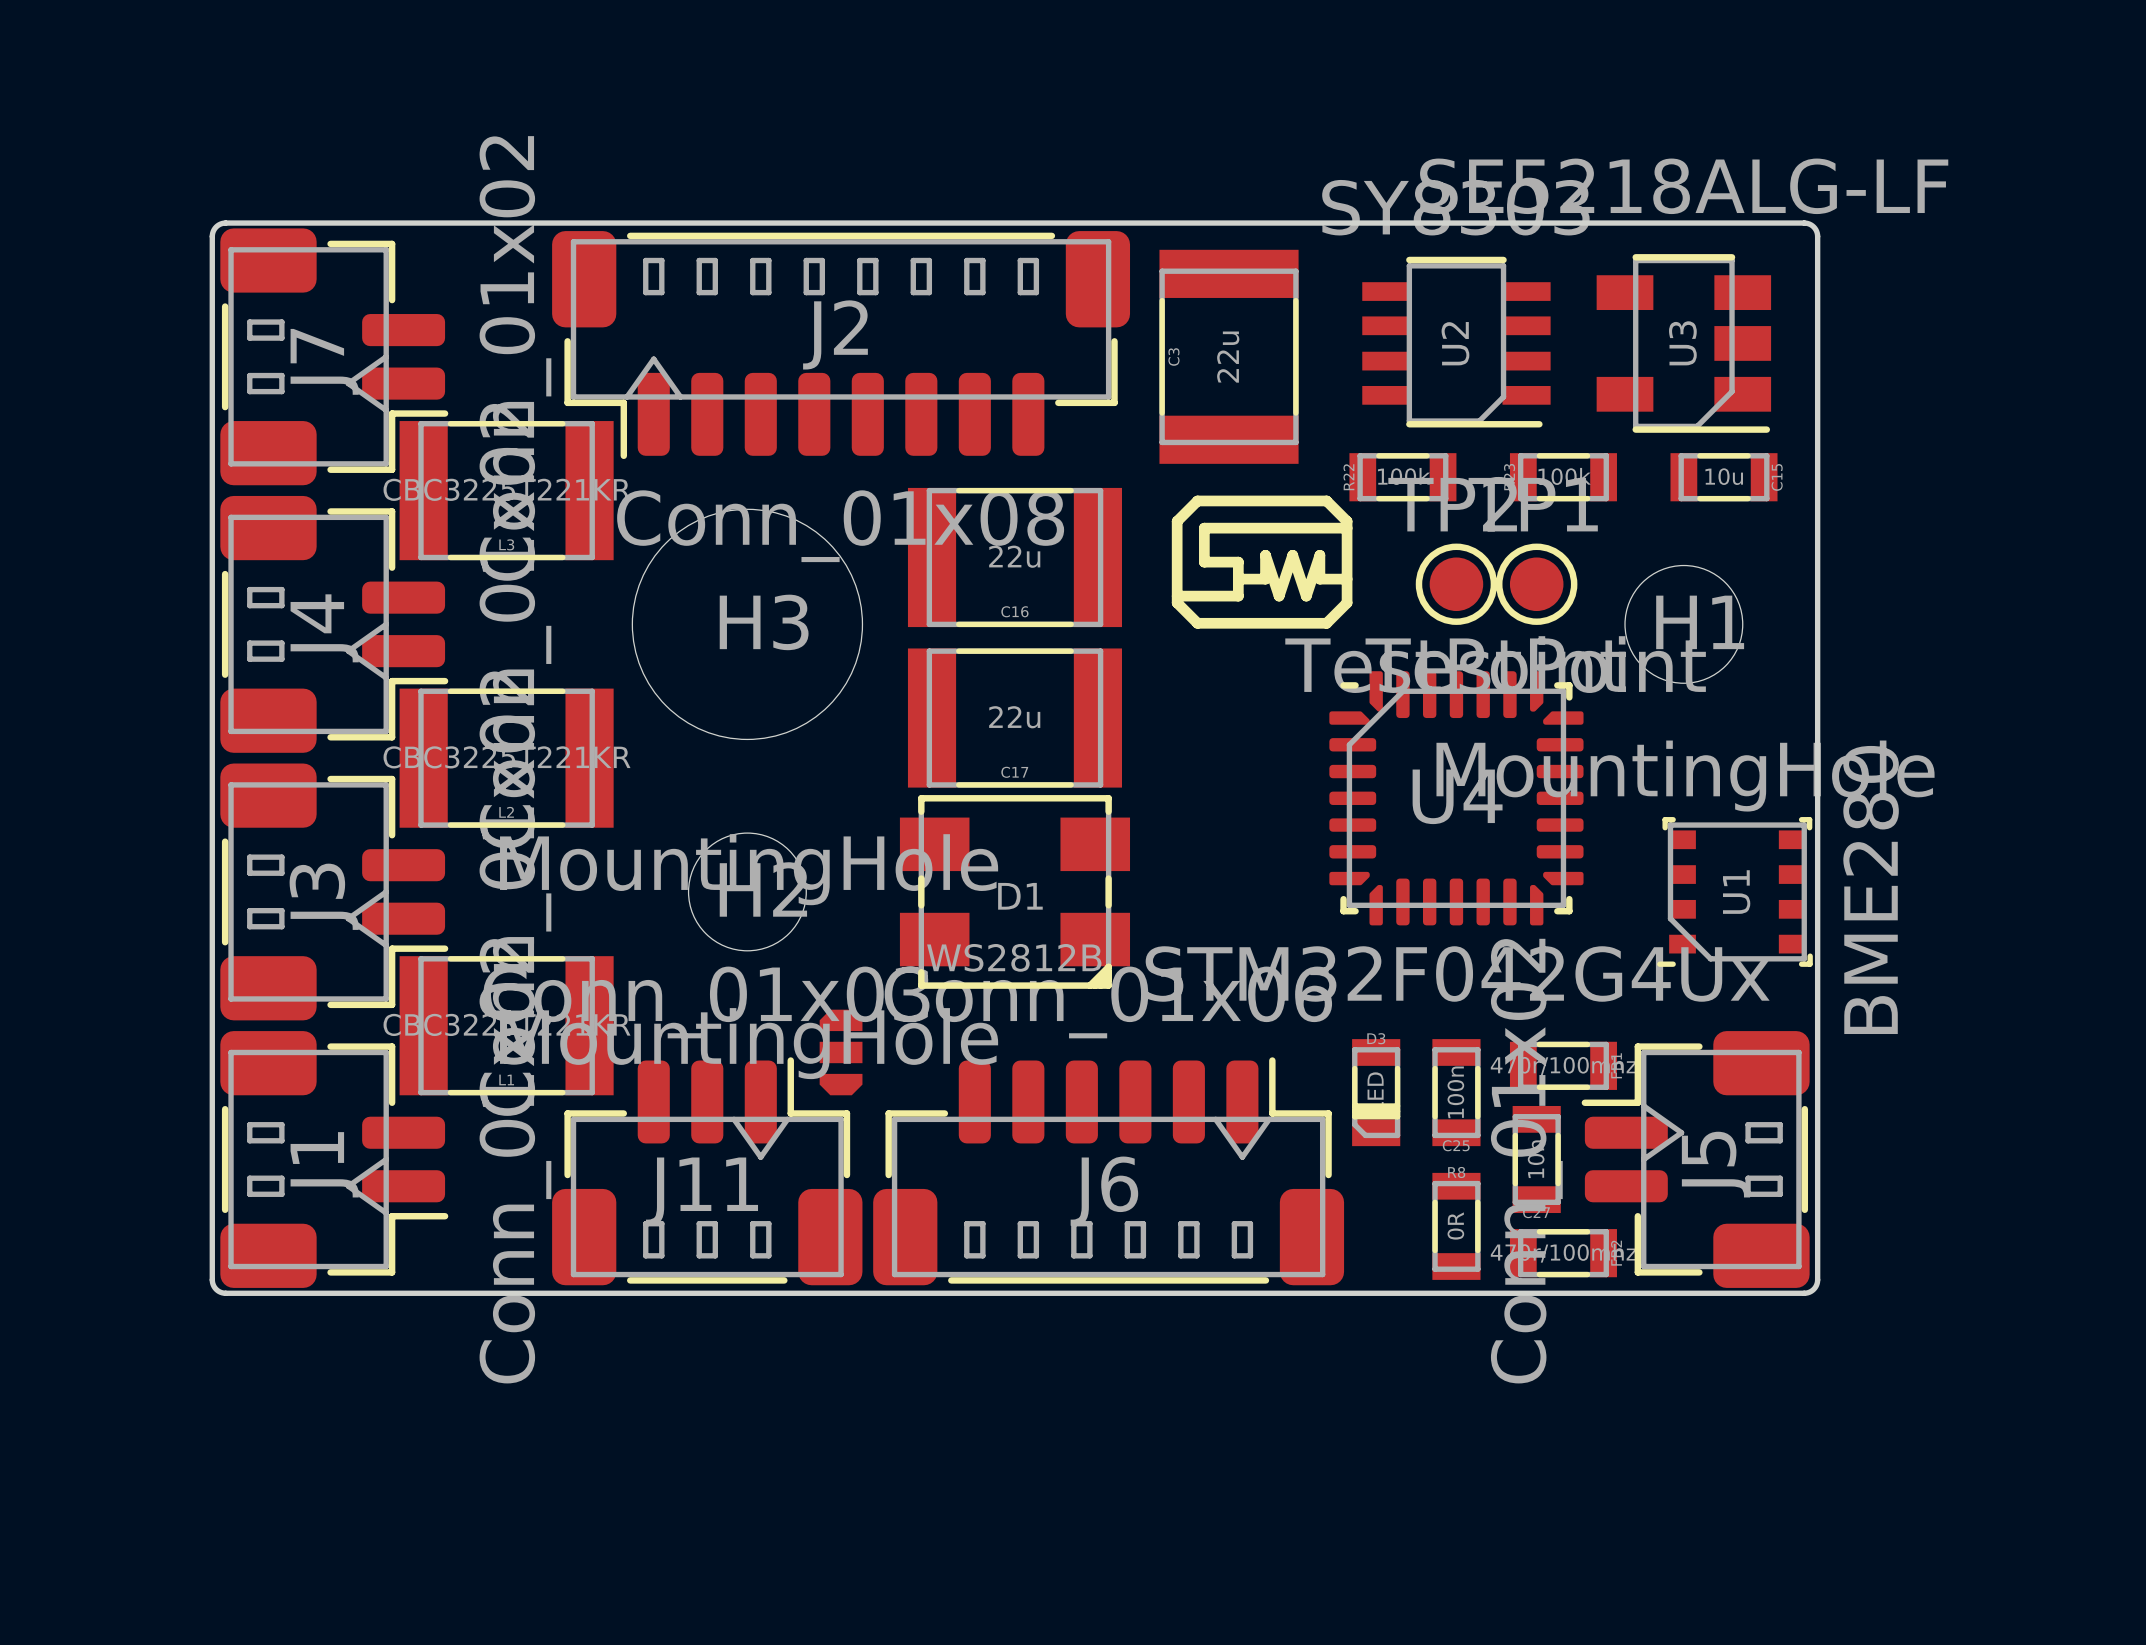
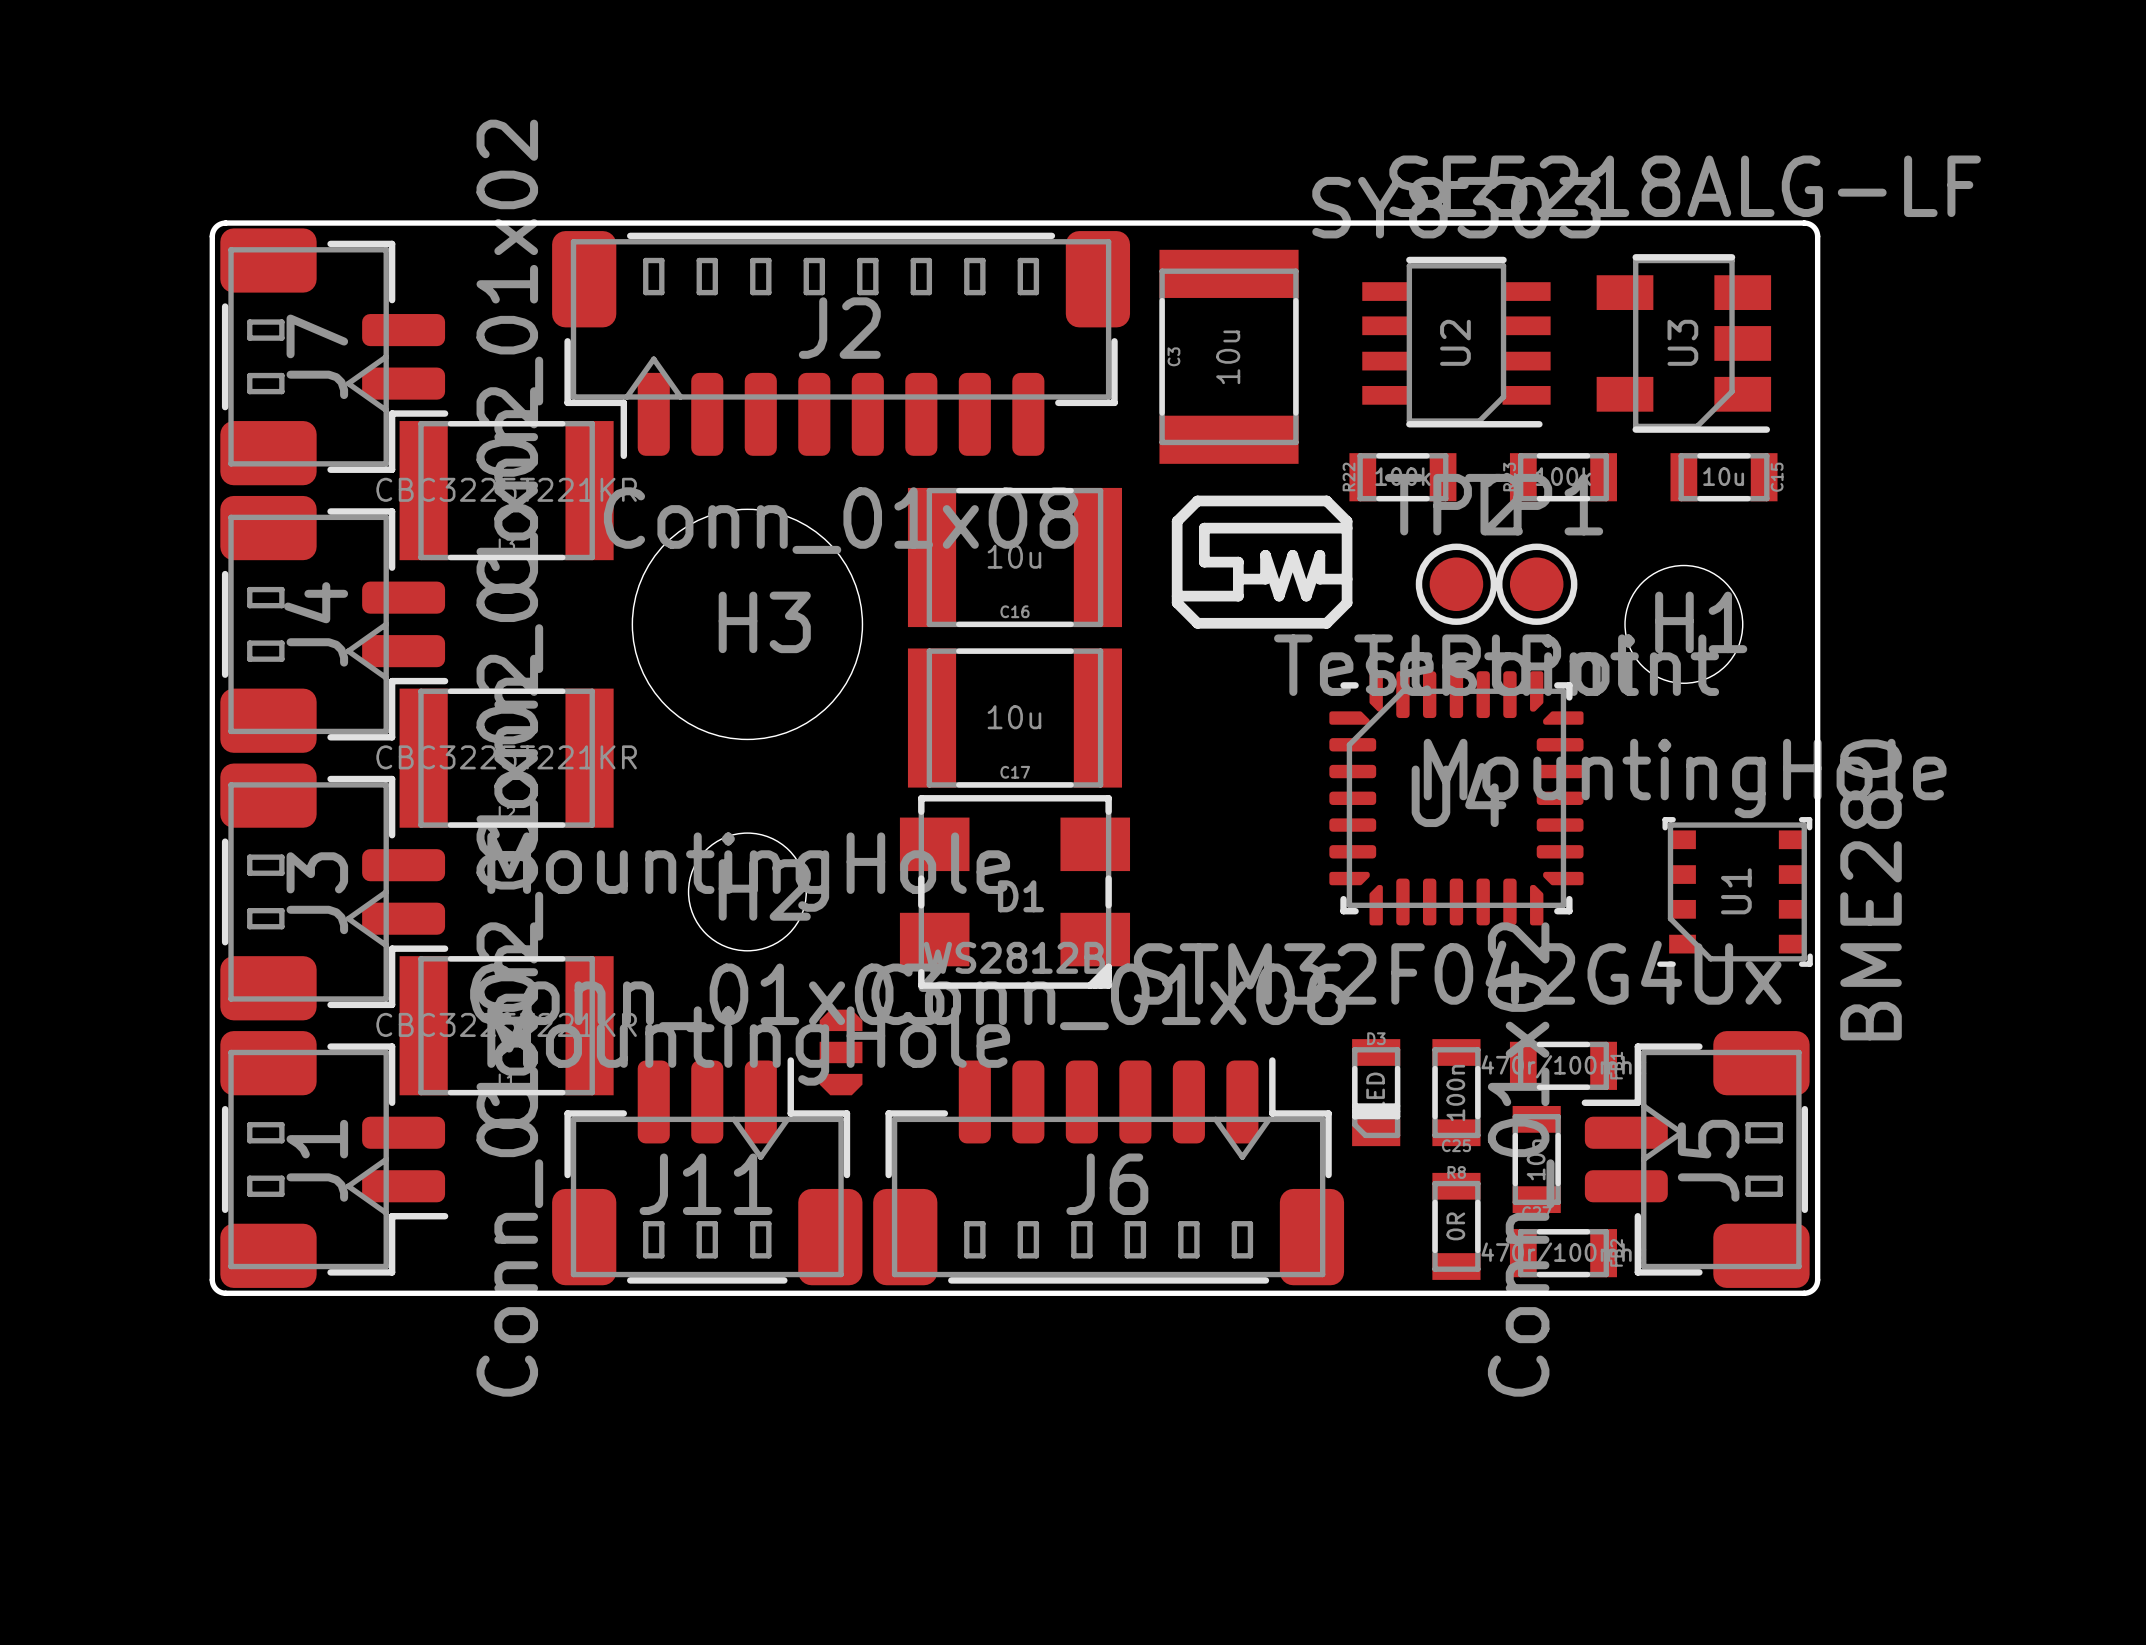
C3 value: 22u (1228, 357) -> 10u (1228, 357)
C16 value: 22u (1014, 556) -> 10u (1014, 556)
C17 value: 22u (1014, 717) -> 10u (1014, 717)

